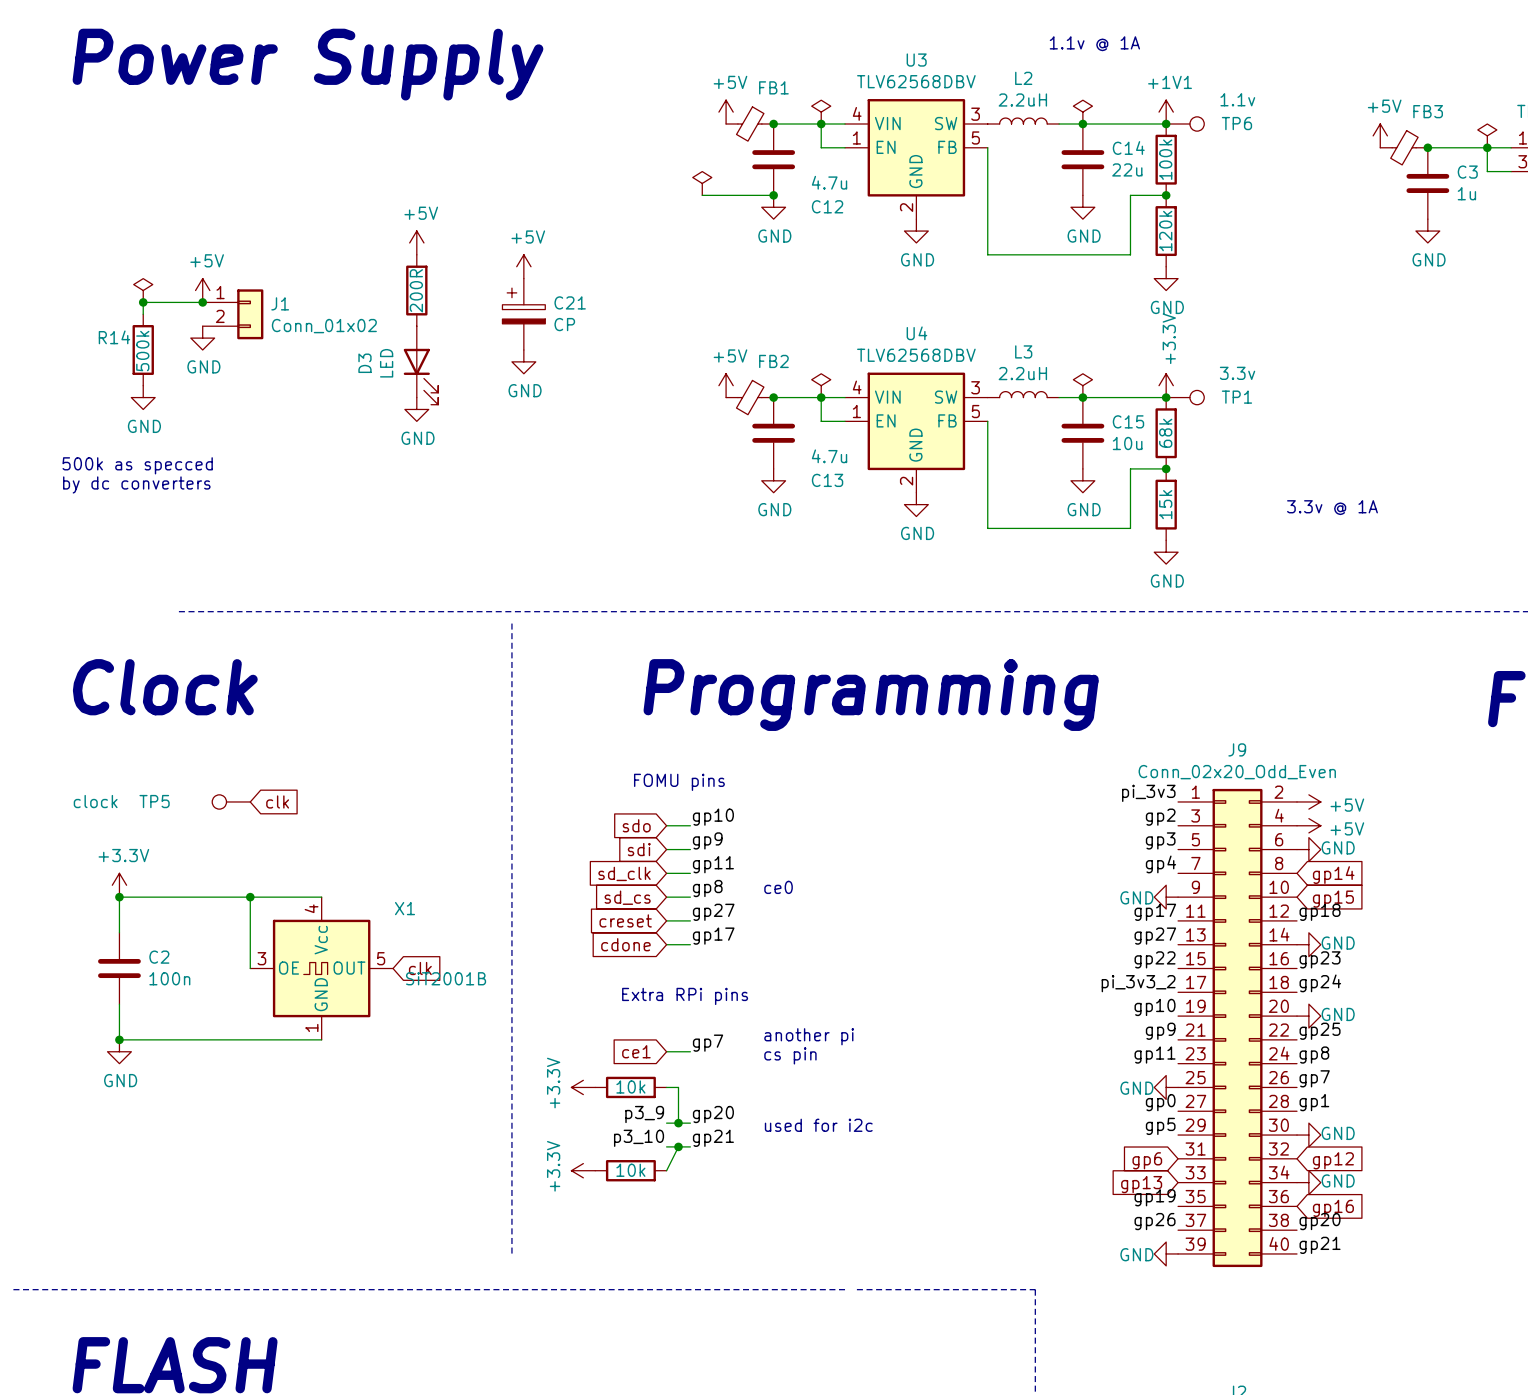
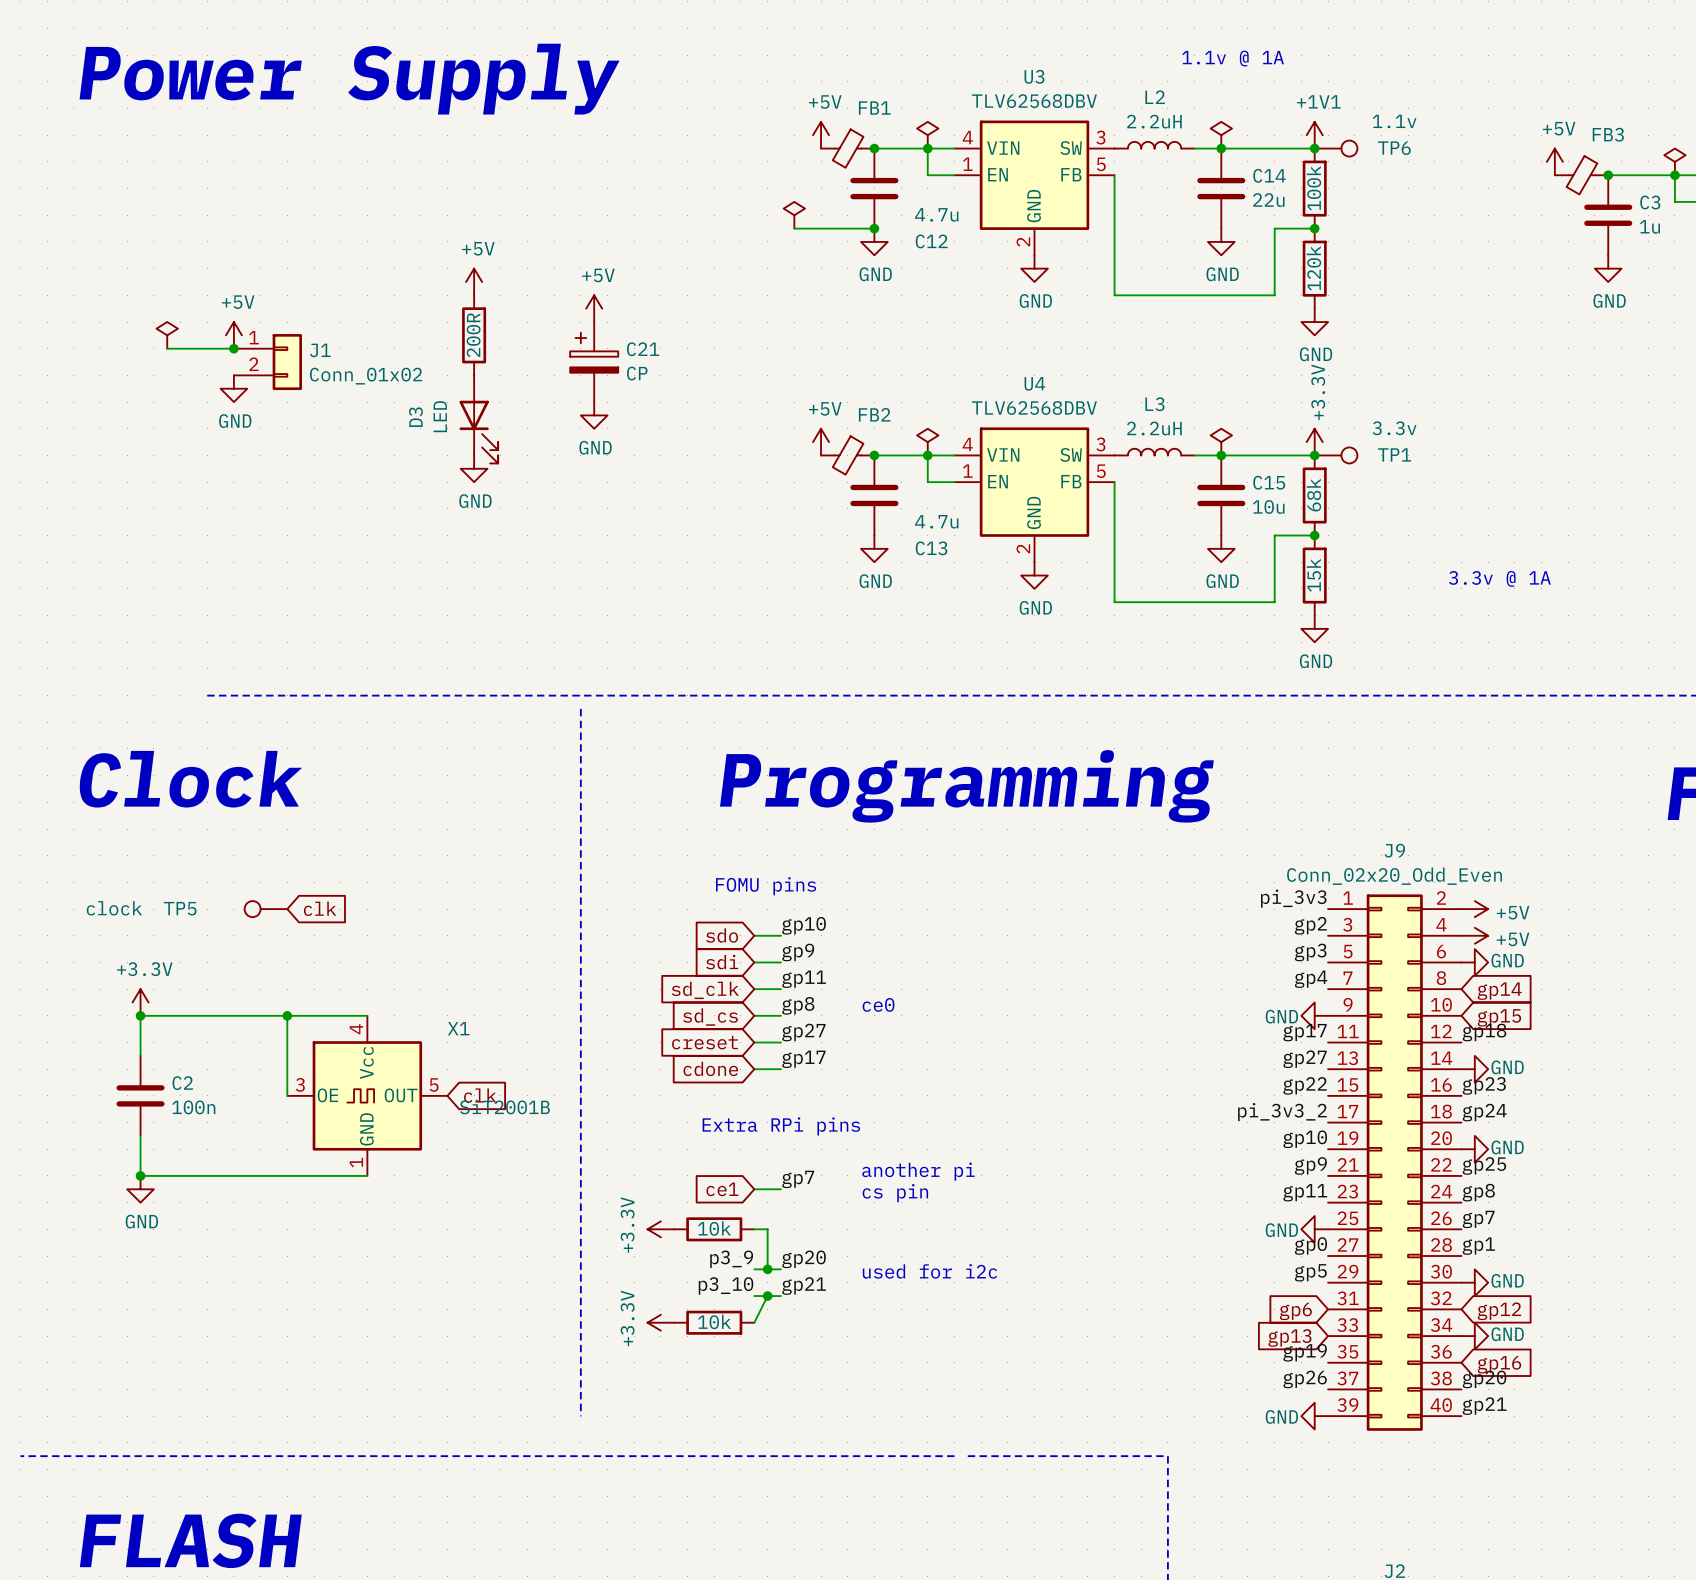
wire: (143, 302) (143, 314) -> none
junction: (143, 302) -> none
R14: 500k (143, 349) -> none
power symbol: GND (143, 397) -> none
text: 500k as specced (137, 465) -> none
text: by dc converters (136, 484) -> none

